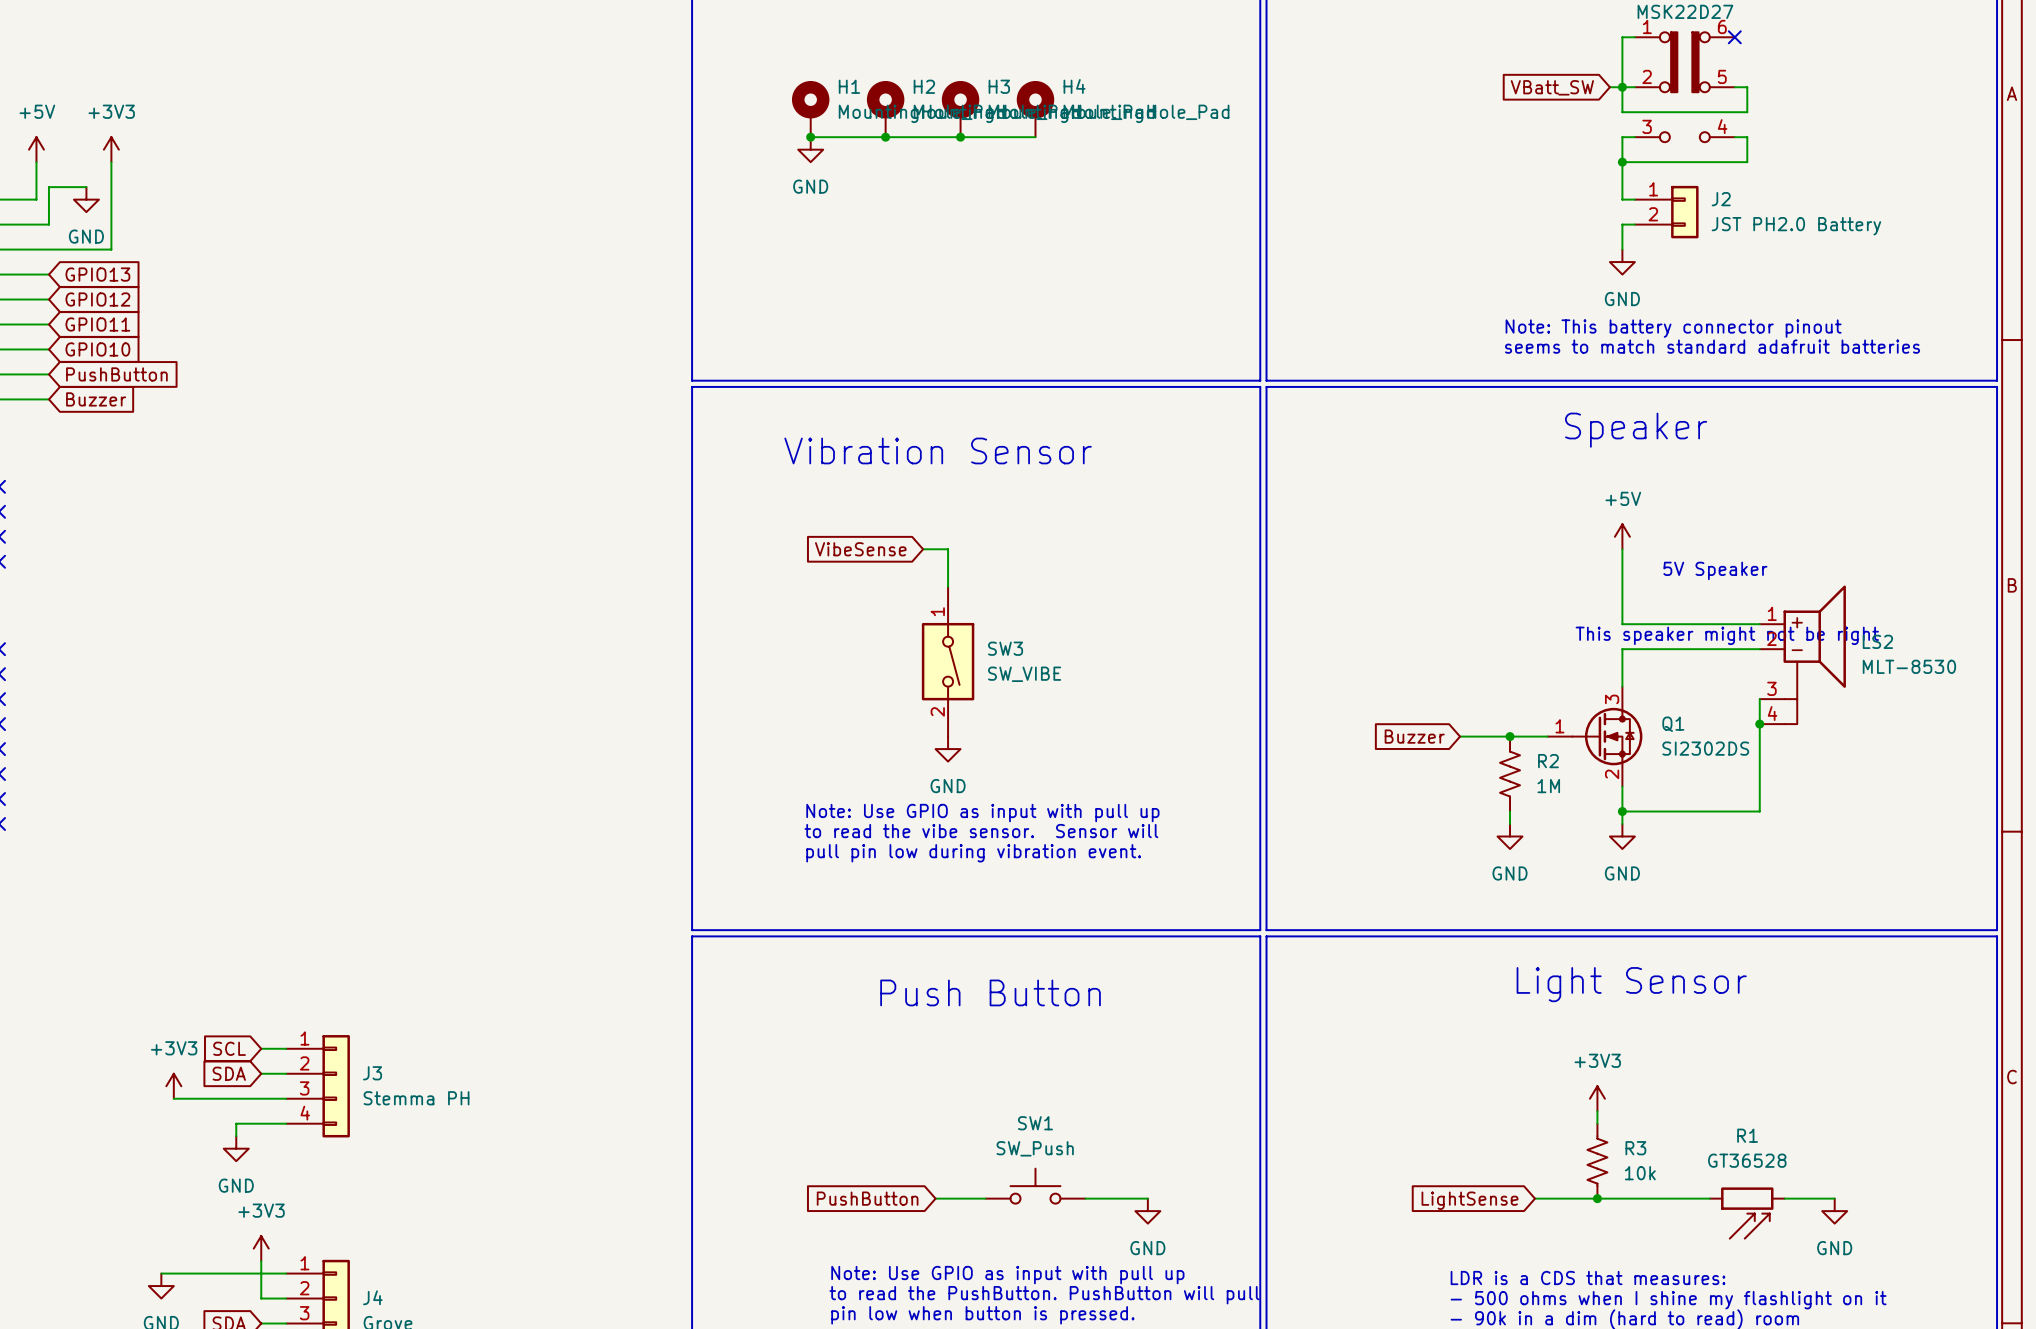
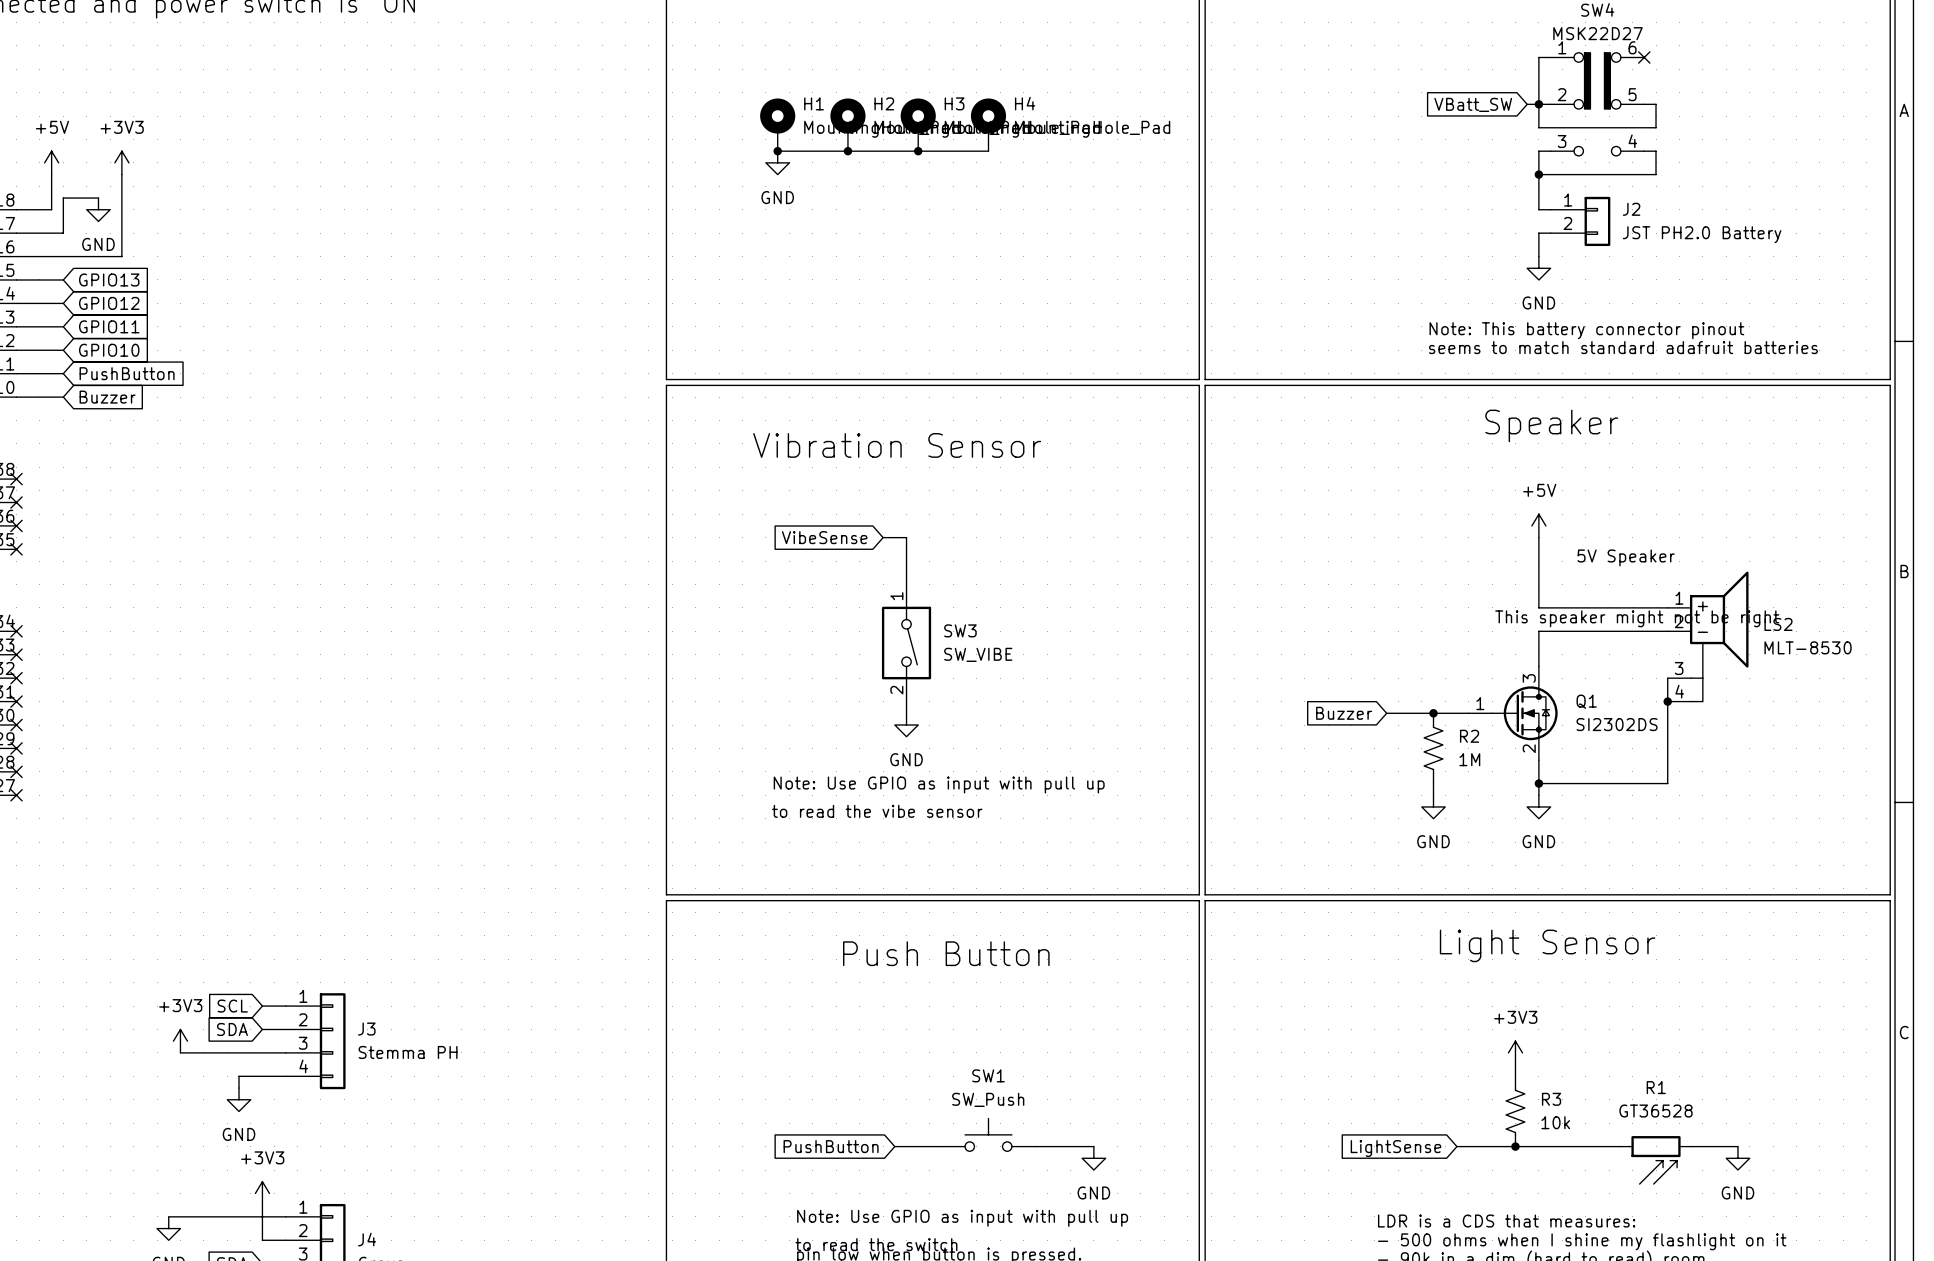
text: to read the vibe sensor. Sensor will (981, 831) -> to read the vibe sensor (877, 811)
text: pull pin low during vibration event. (973, 853) -> none
text: to read the PushButton. PushButton will pull (1044, 1295) -> none
text: none -> to read the switch (876, 1244)

